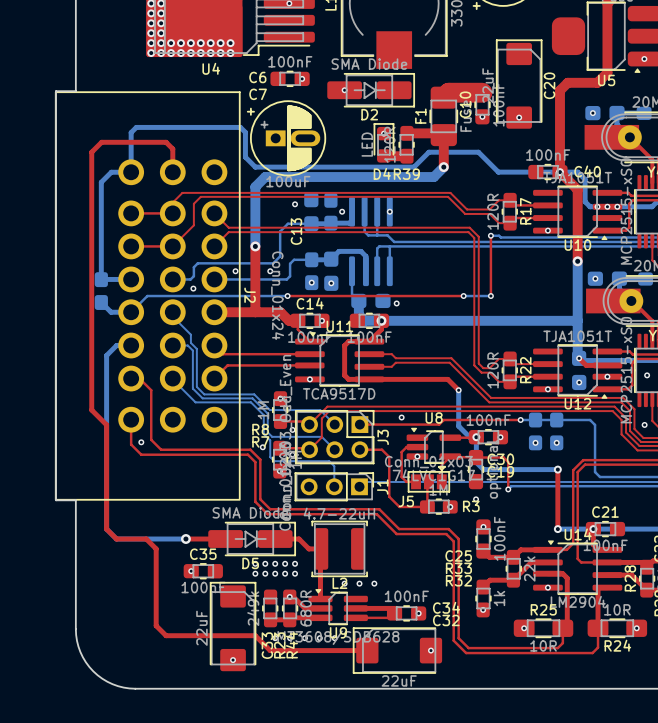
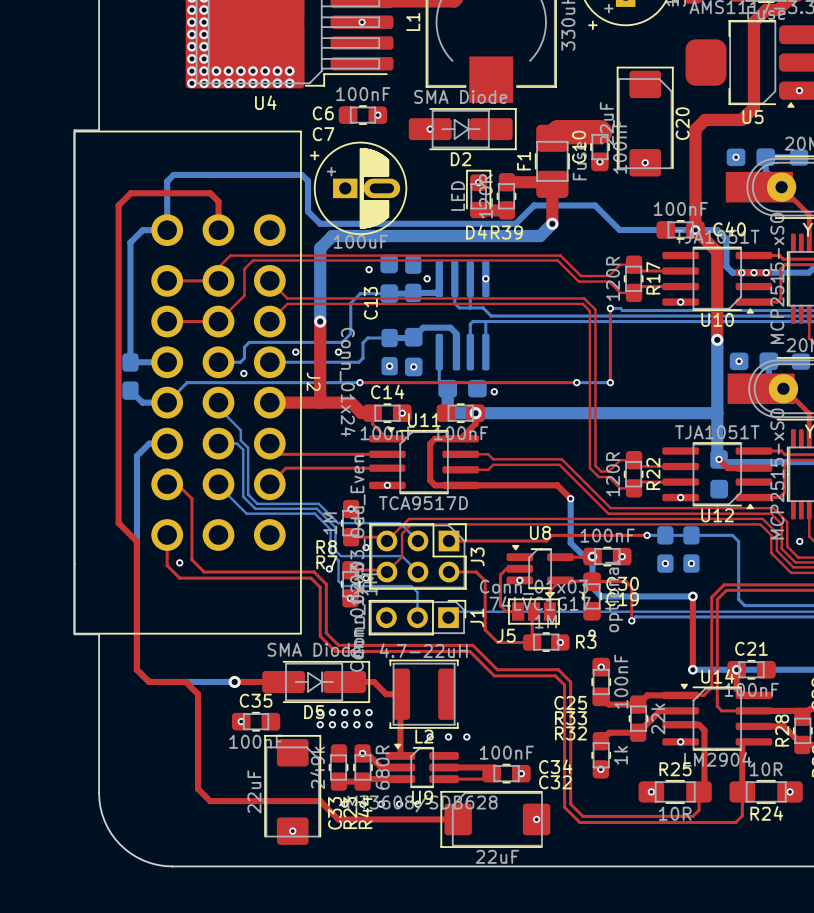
via: (647, 375) -> none
via: (607, 376) -> none
via: (579, 382) -> none
via: (401, 417) -> none

